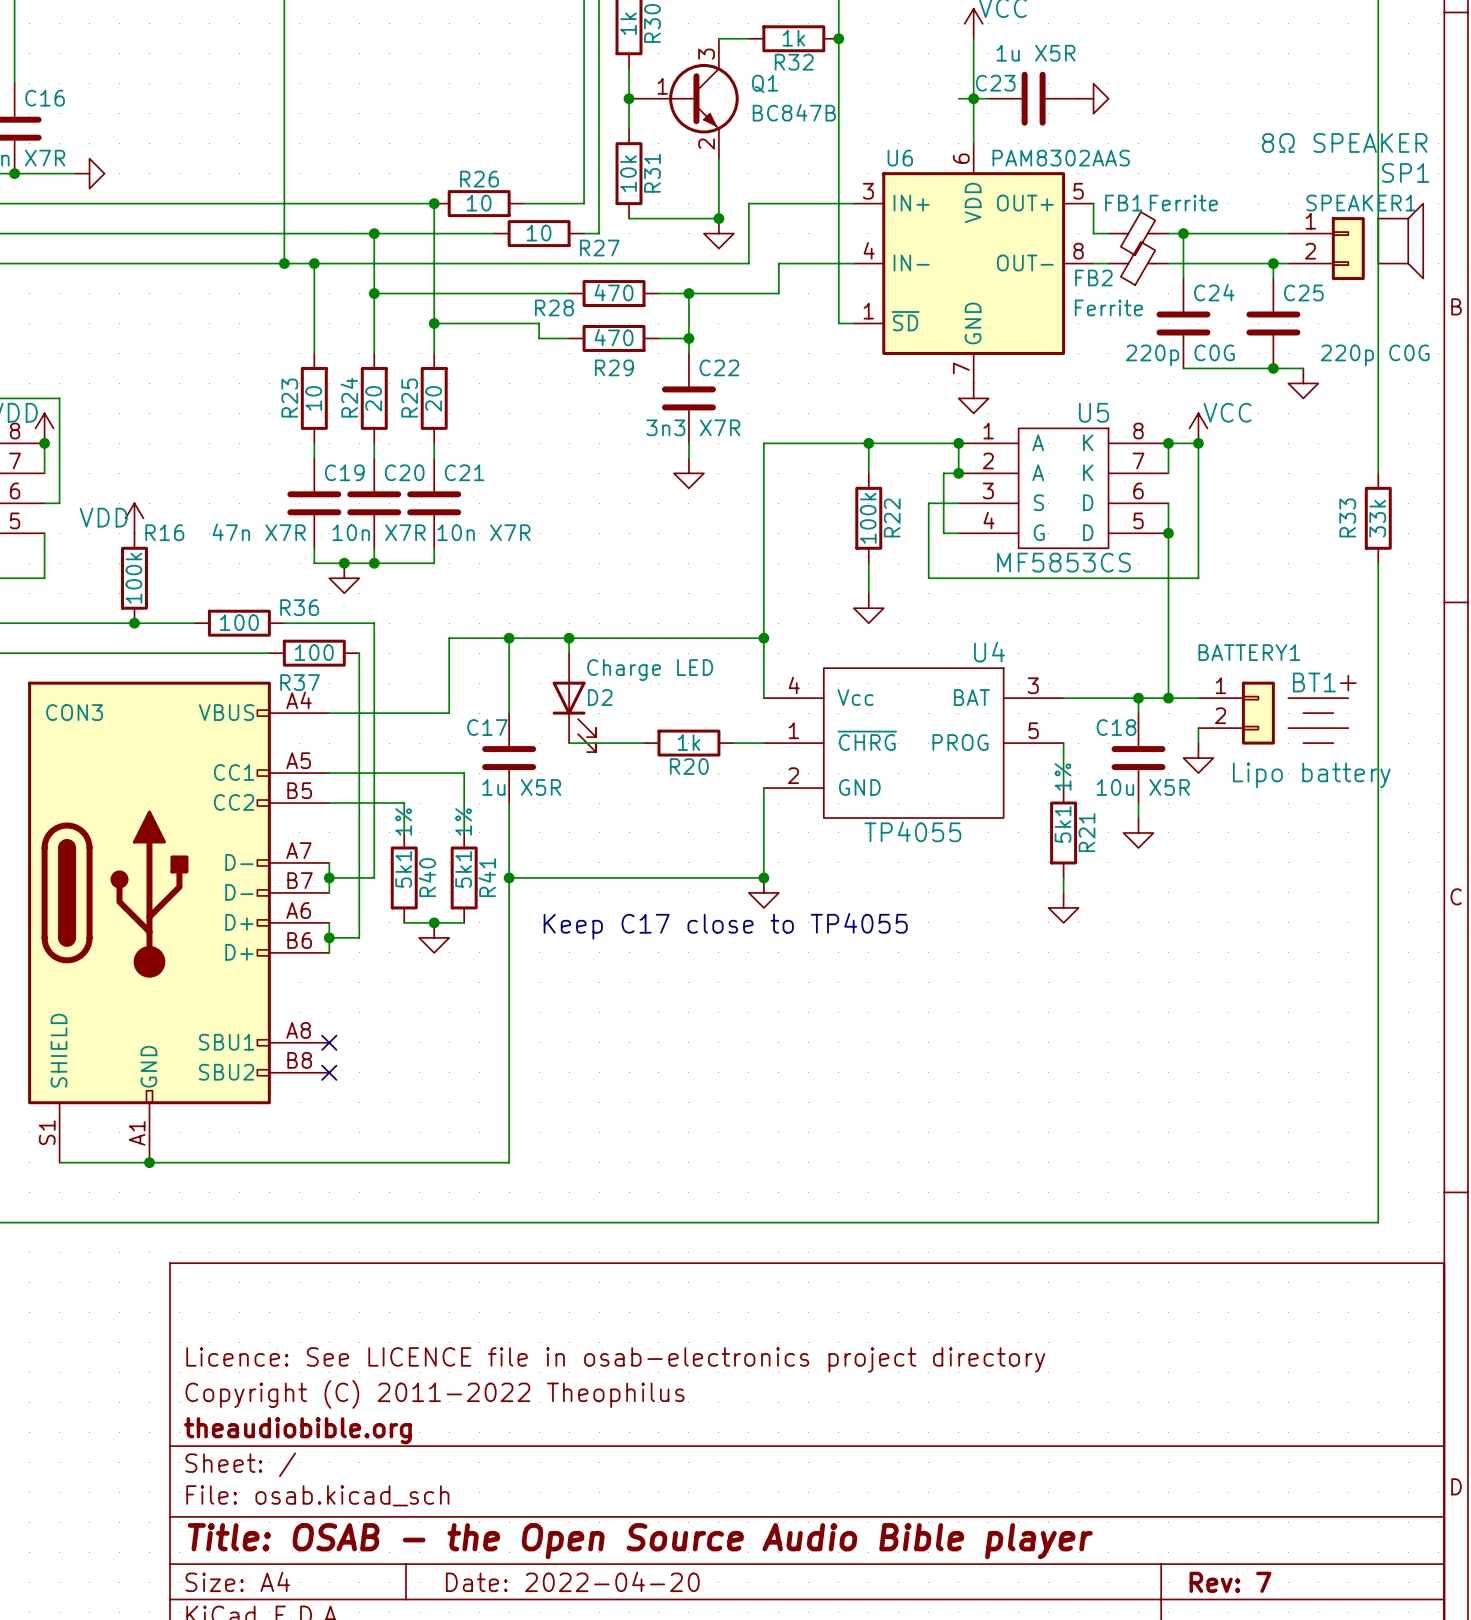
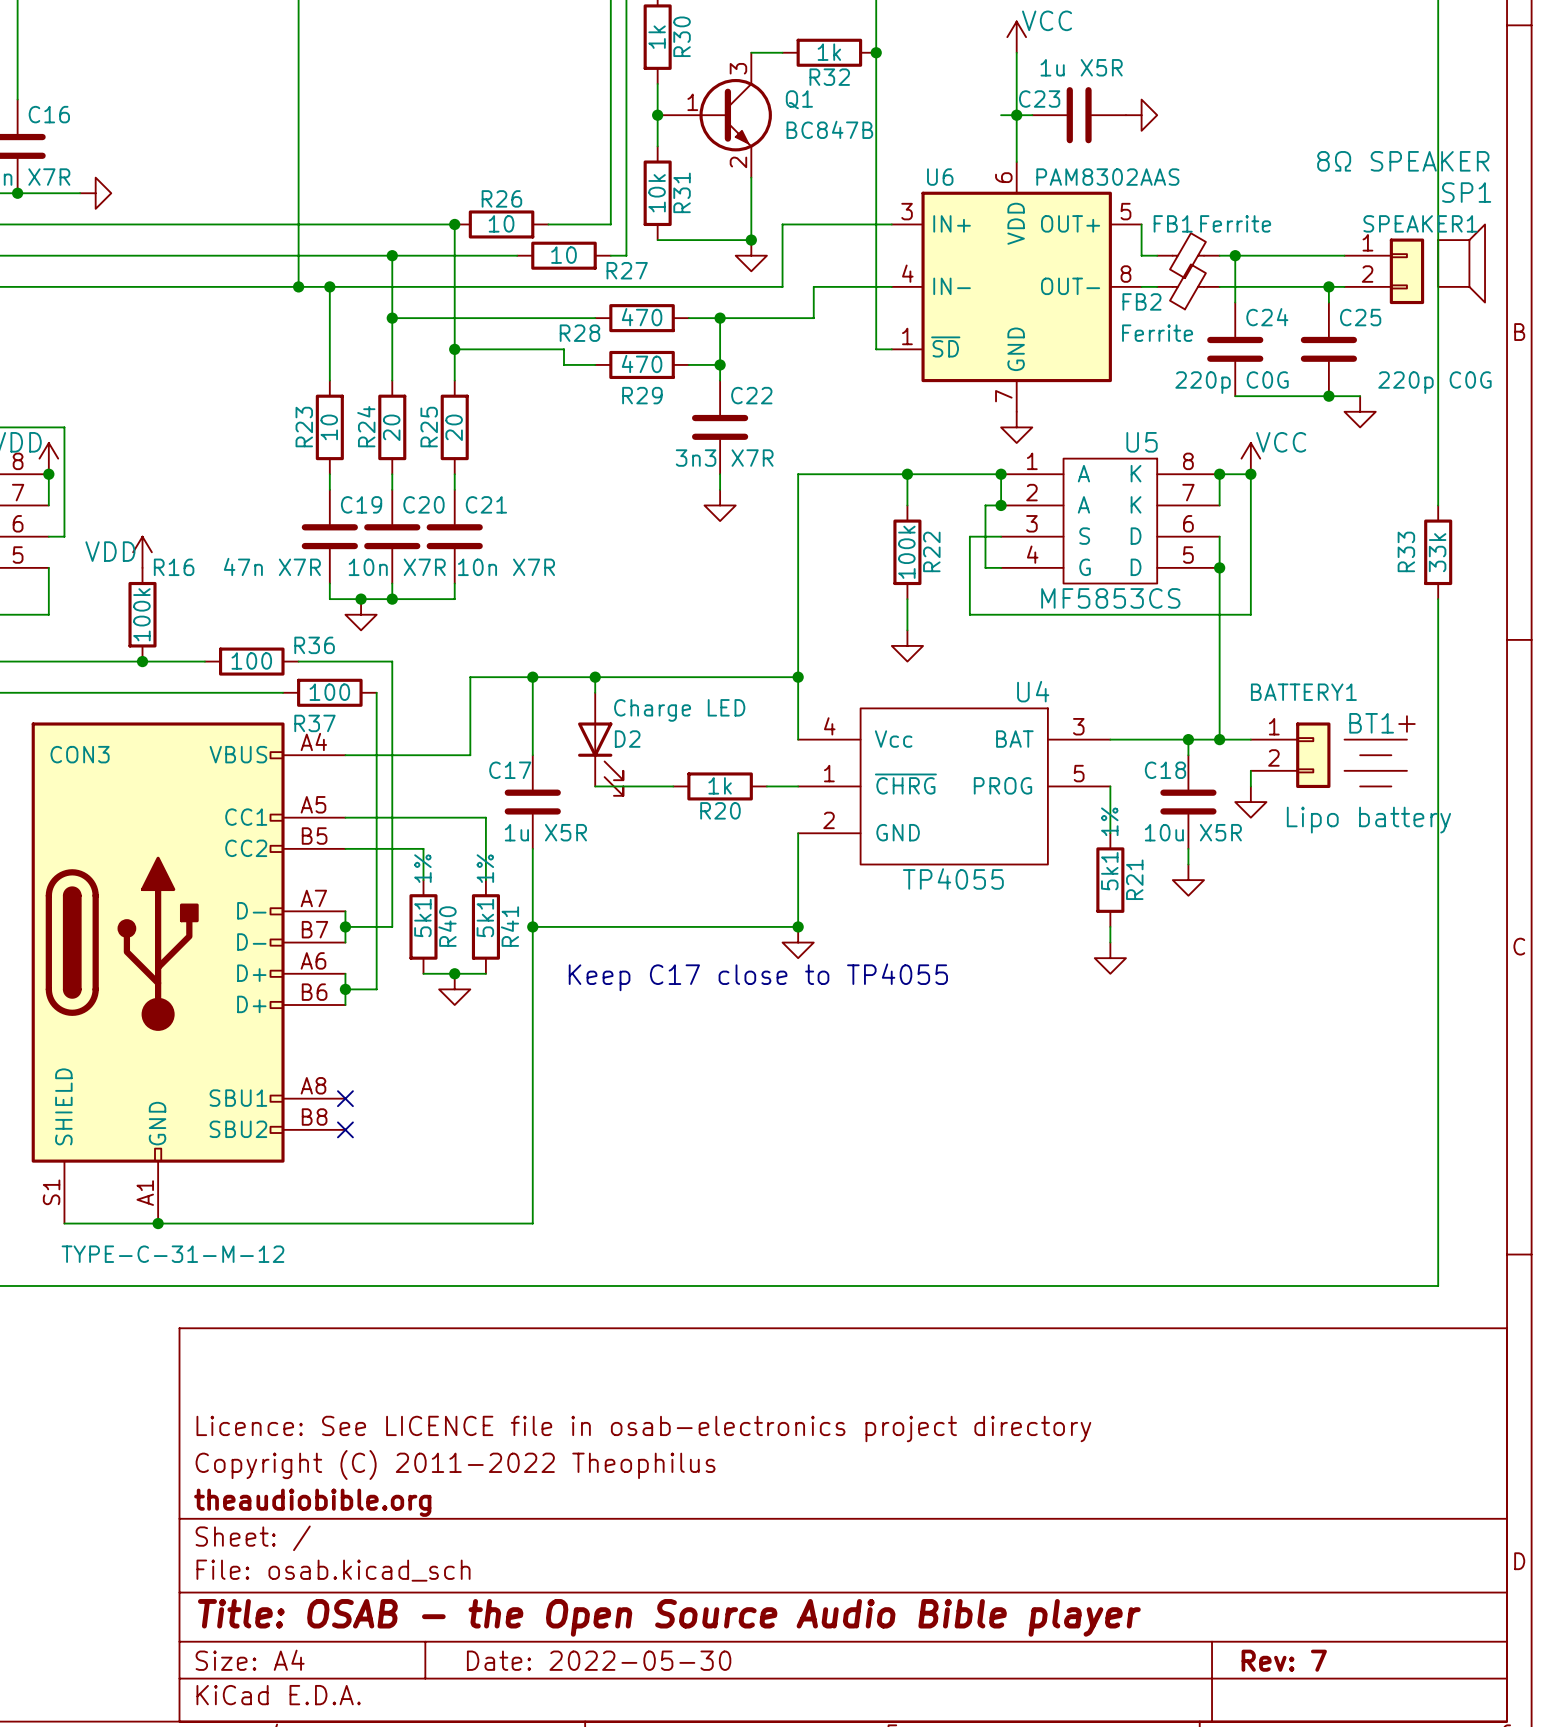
CON3 value: none -> TYPE-C-31-M-12 (172, 1254)
title block: Date: 2022-04-20 (572, 1581) -> Date: 2022-05-30 (599, 1660)

